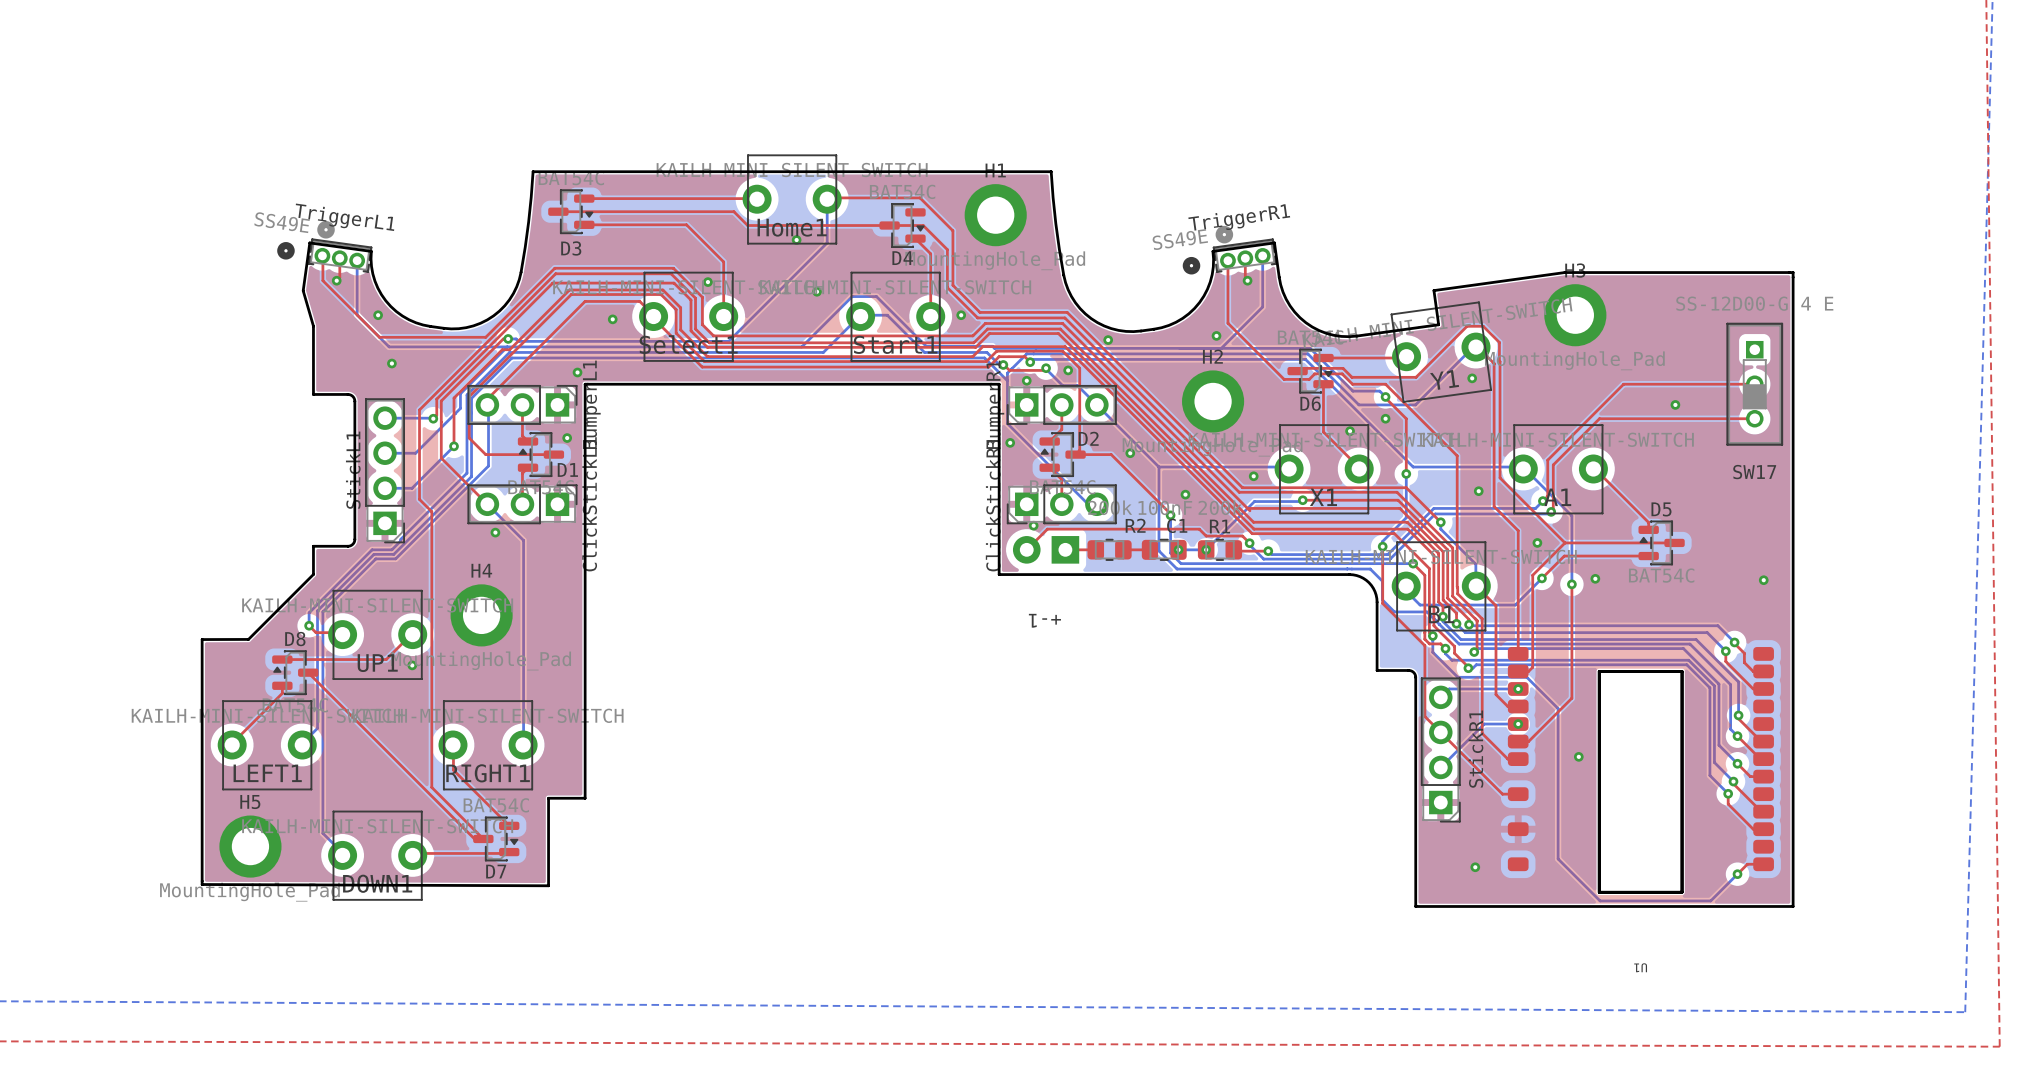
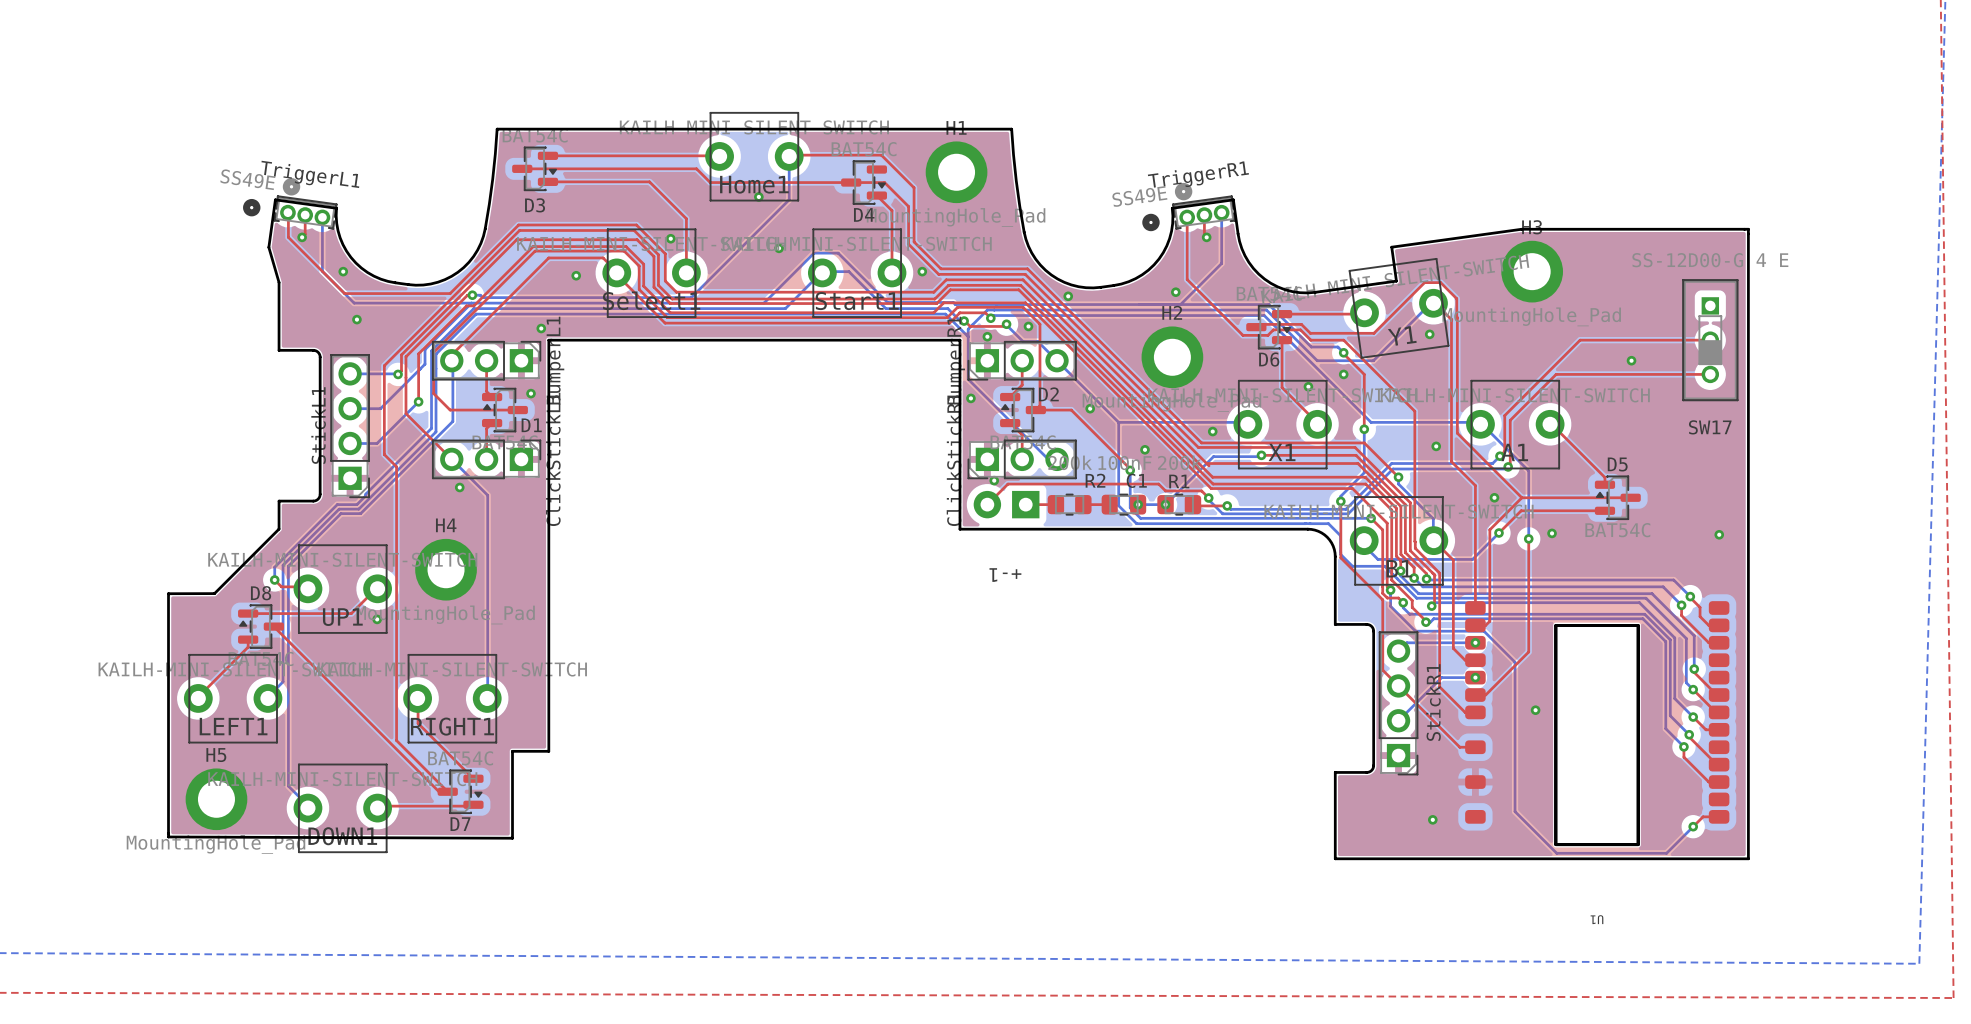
board edge: (1415, 812) (1415, 906) -> (1373, 765) (1372, 769) (1367, 772) (1335, 772) (1335, 858) (1373, 858)

